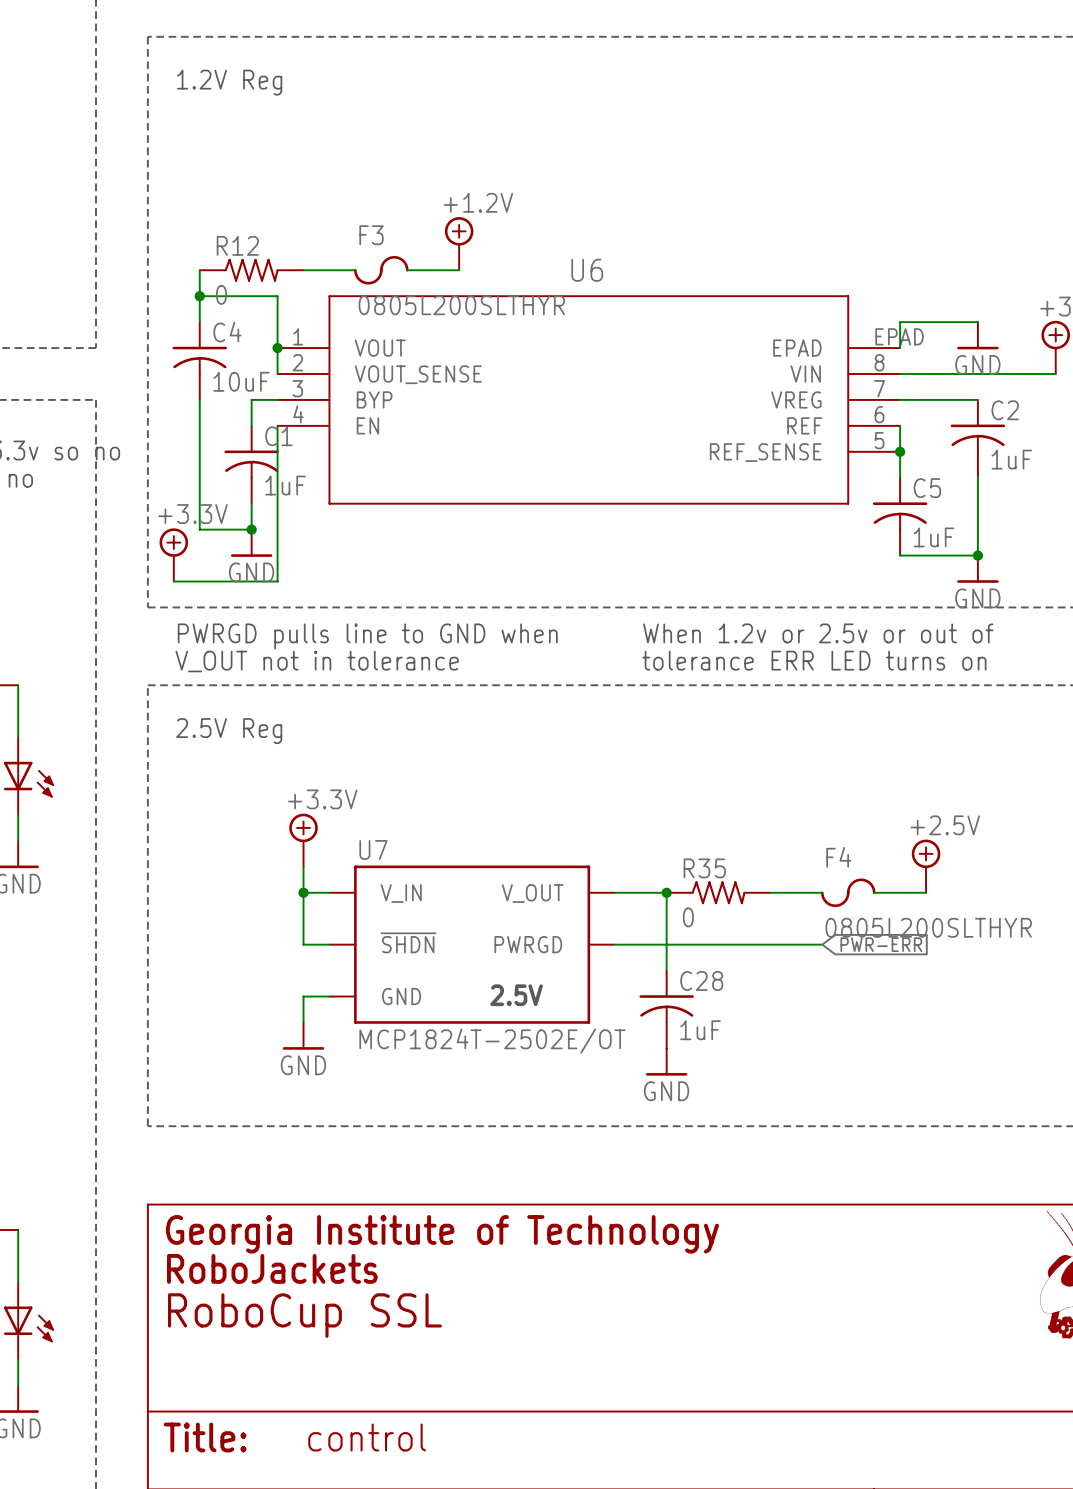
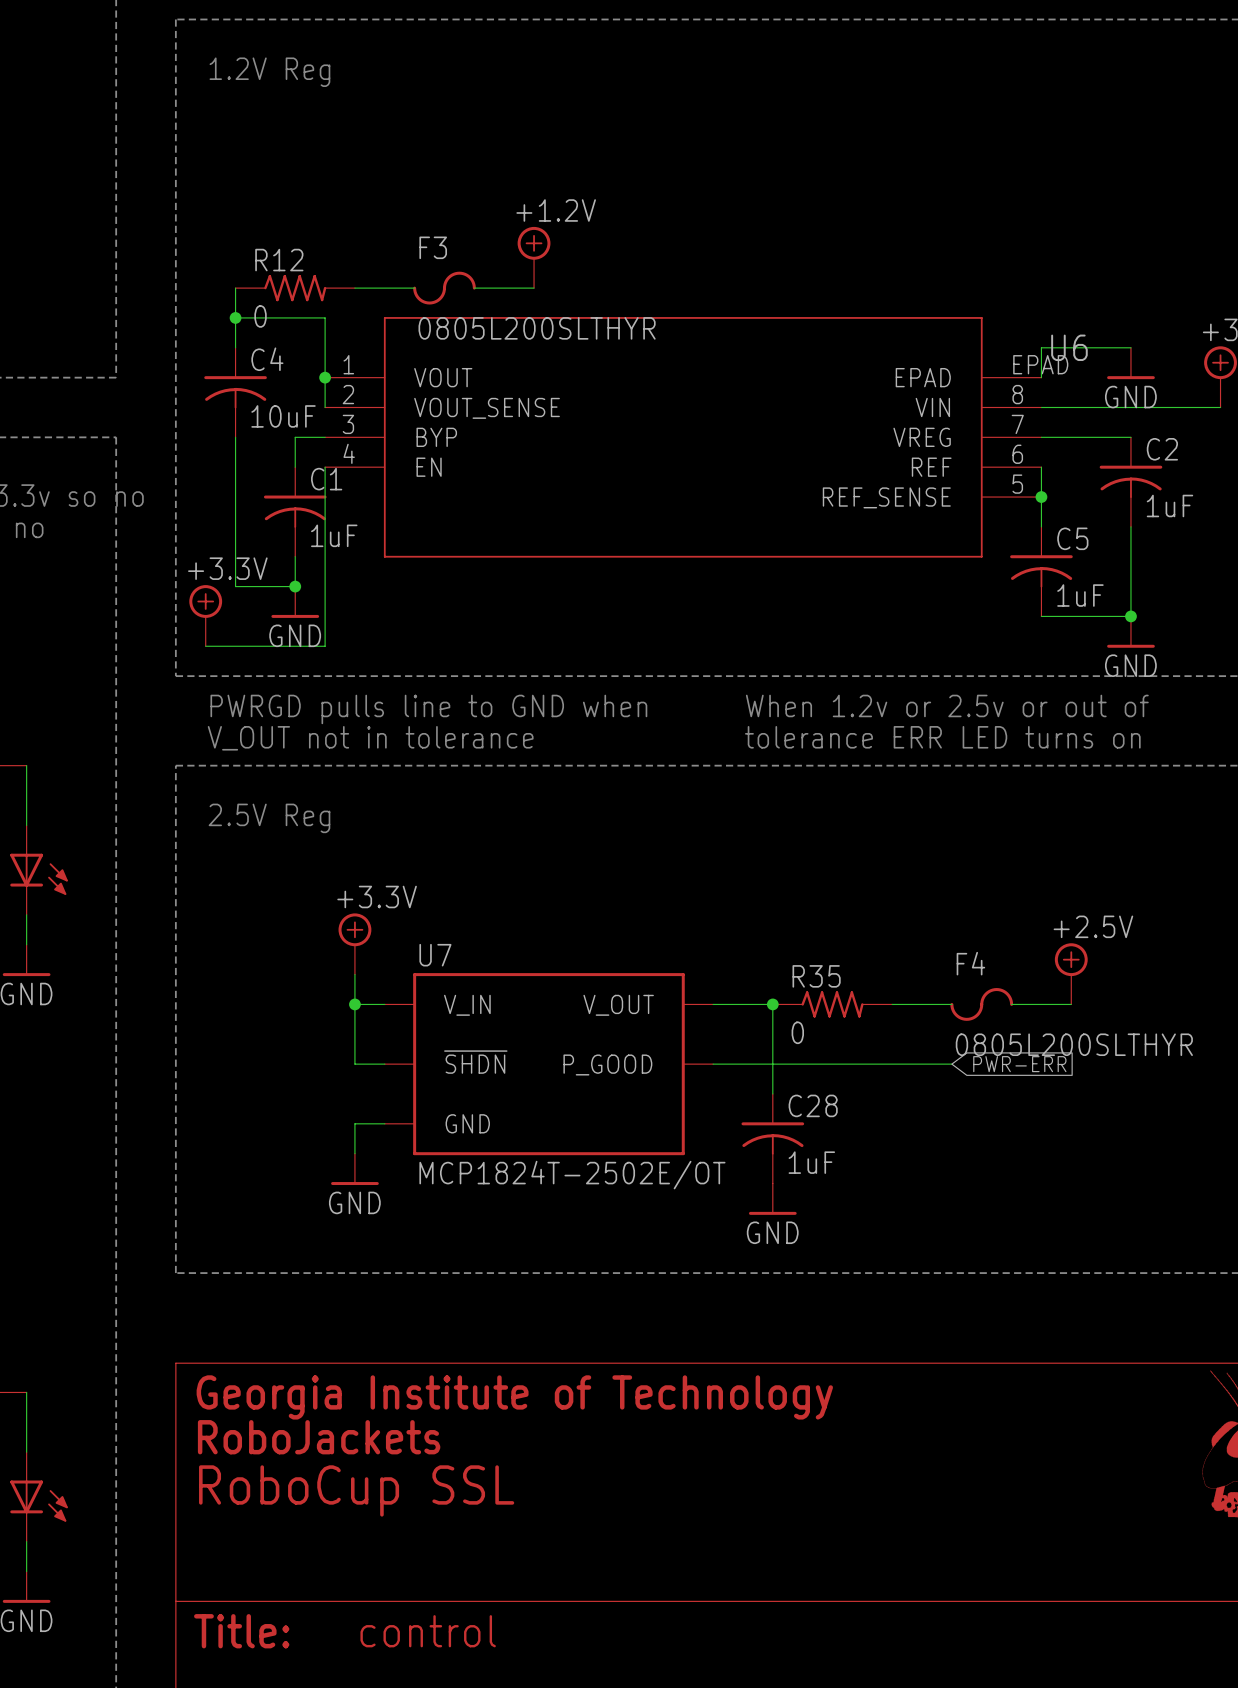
U6 name position: U6 (587, 270) -> U6 (1069, 347)
U7 pin name: PWRGD (528, 944) -> P_GOOD (607, 1064)
U7 text: 2.5V (516, 995) -> none

